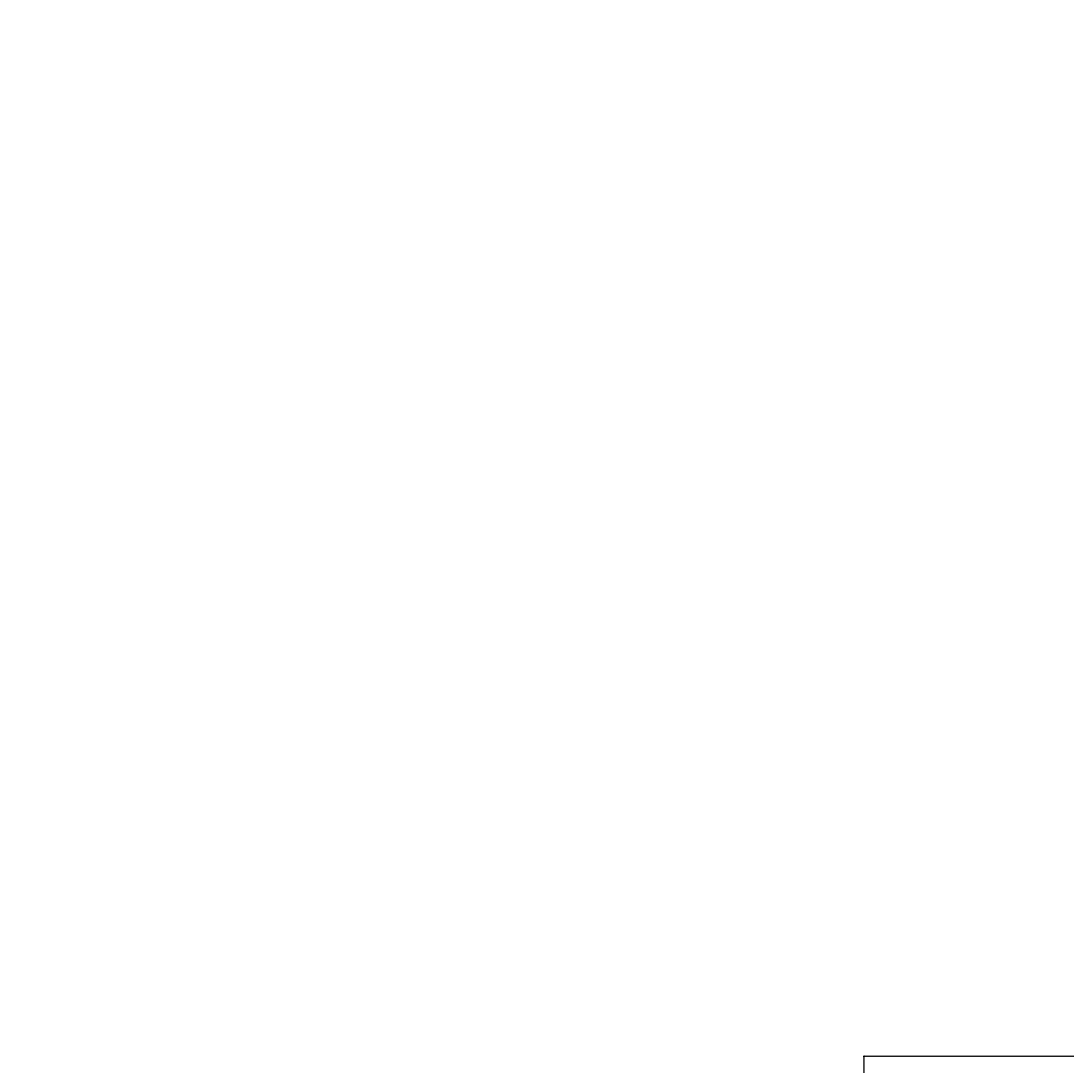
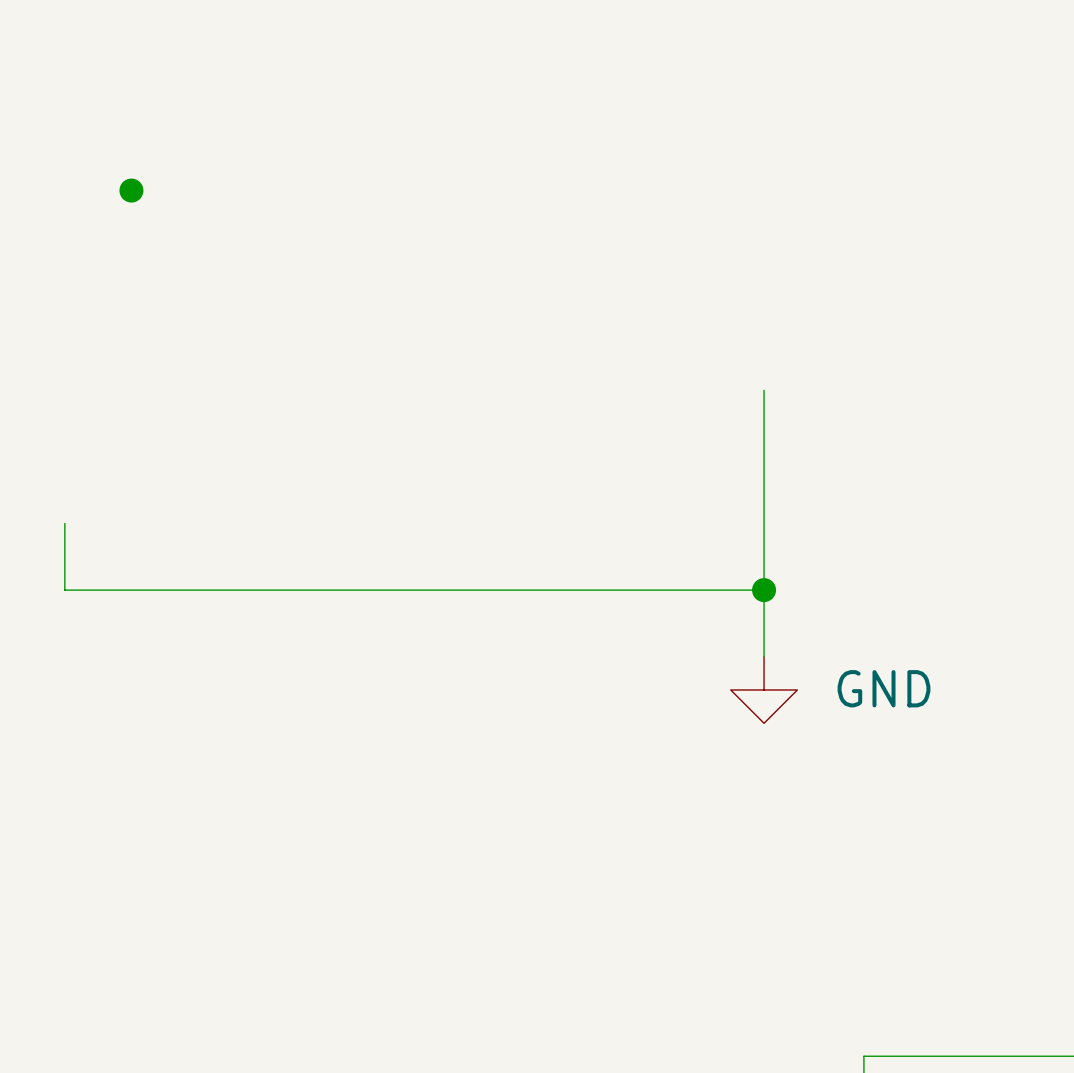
junction: none -> (131, 190)
wire: none -> (764, 390) (764, 656)
wire: none -> (64, 523) (64, 590) (764, 590)
junction: none -> (764, 590)
power symbol: none -> GND (764, 689)

